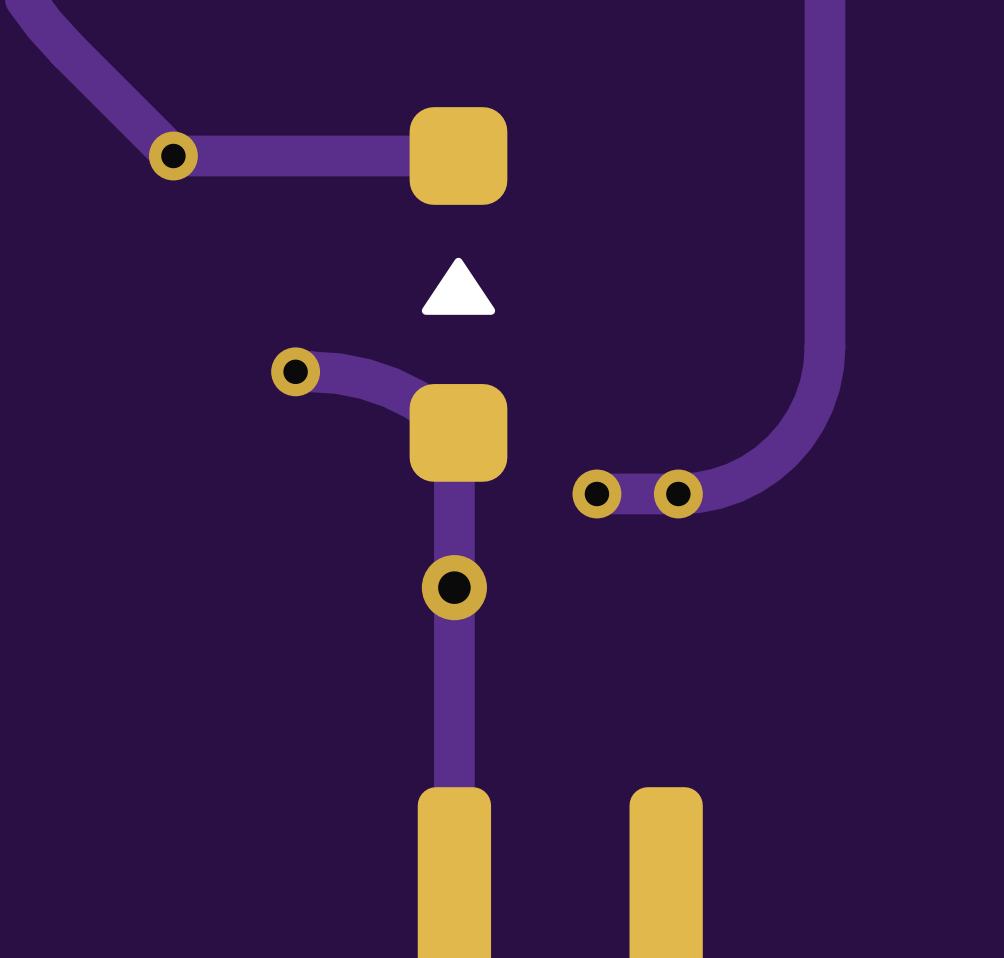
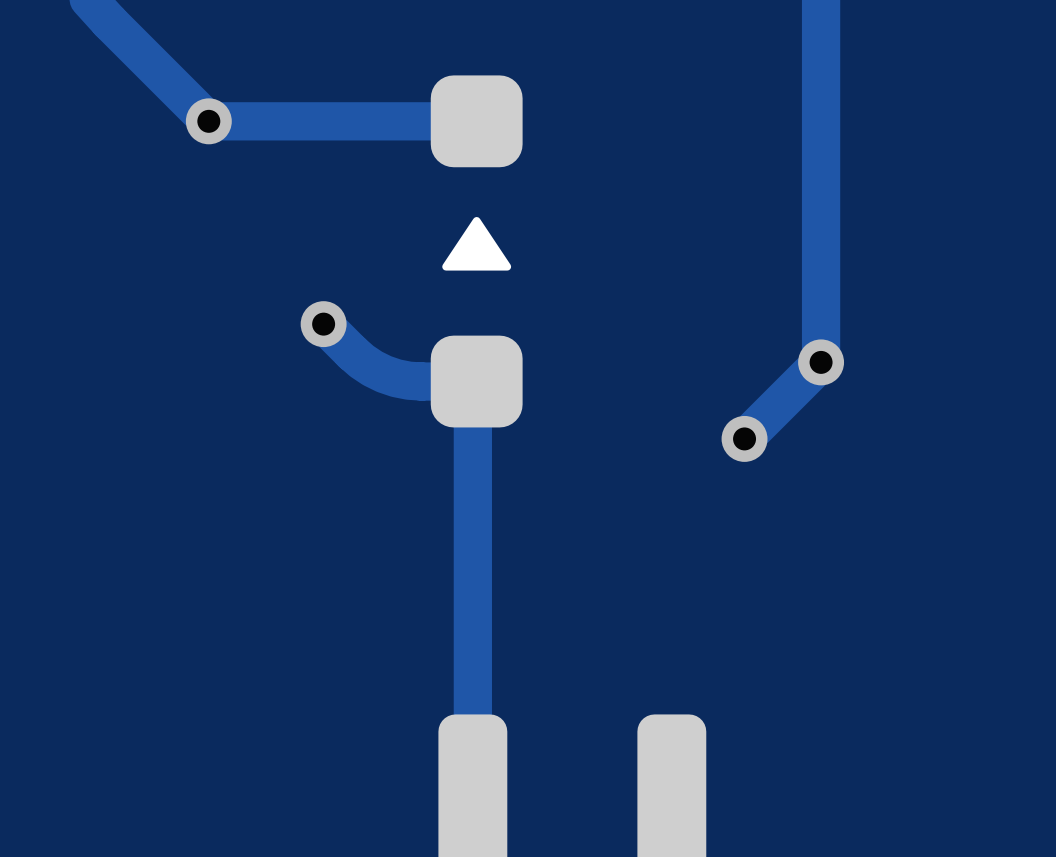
track: (824, 347) (819, 385) (805, 420) (782, 451) (751, 474) (716, 488) (697, 492) (596, 493) -> (821, 301) (821, 362) (744, 438)
track: (295, 371) (338, 373) (364, 378) (390, 387) (415, 399) (437, 414) (458, 432) -> (323, 324) (361, 361) (384, 374) (408, 380) (473, 381)
via: none -> (821, 362)
via: (596, 493) -> none
via position: (678, 493) -> (744, 438)
via: (454, 587) -> none

